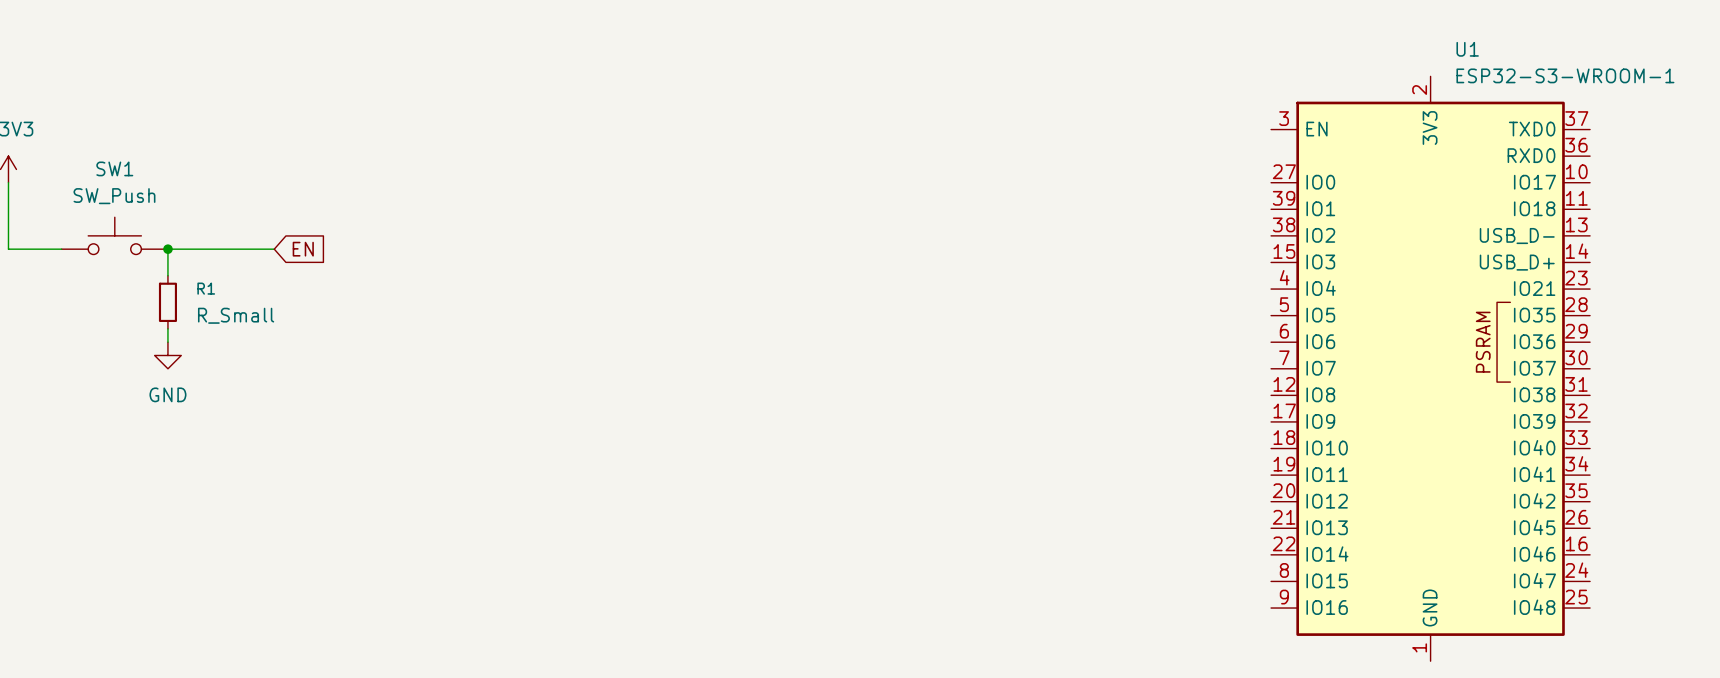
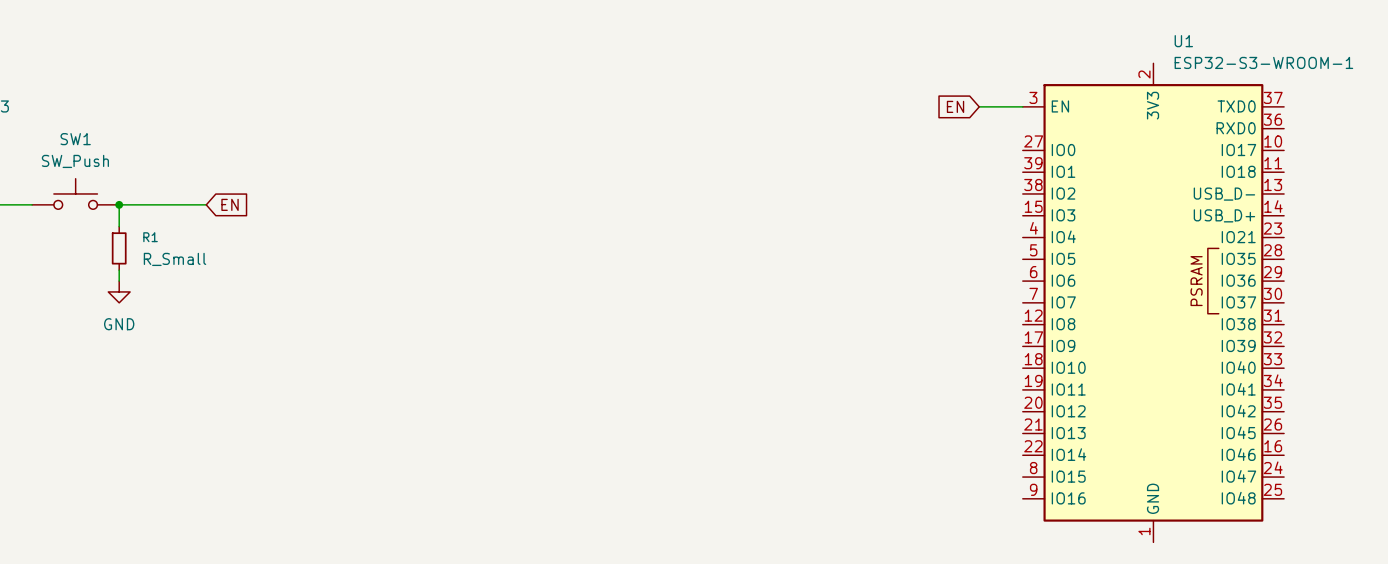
global label: none -> EN (955, 106)
wire: none -> (979, 106) (1022, 106)

